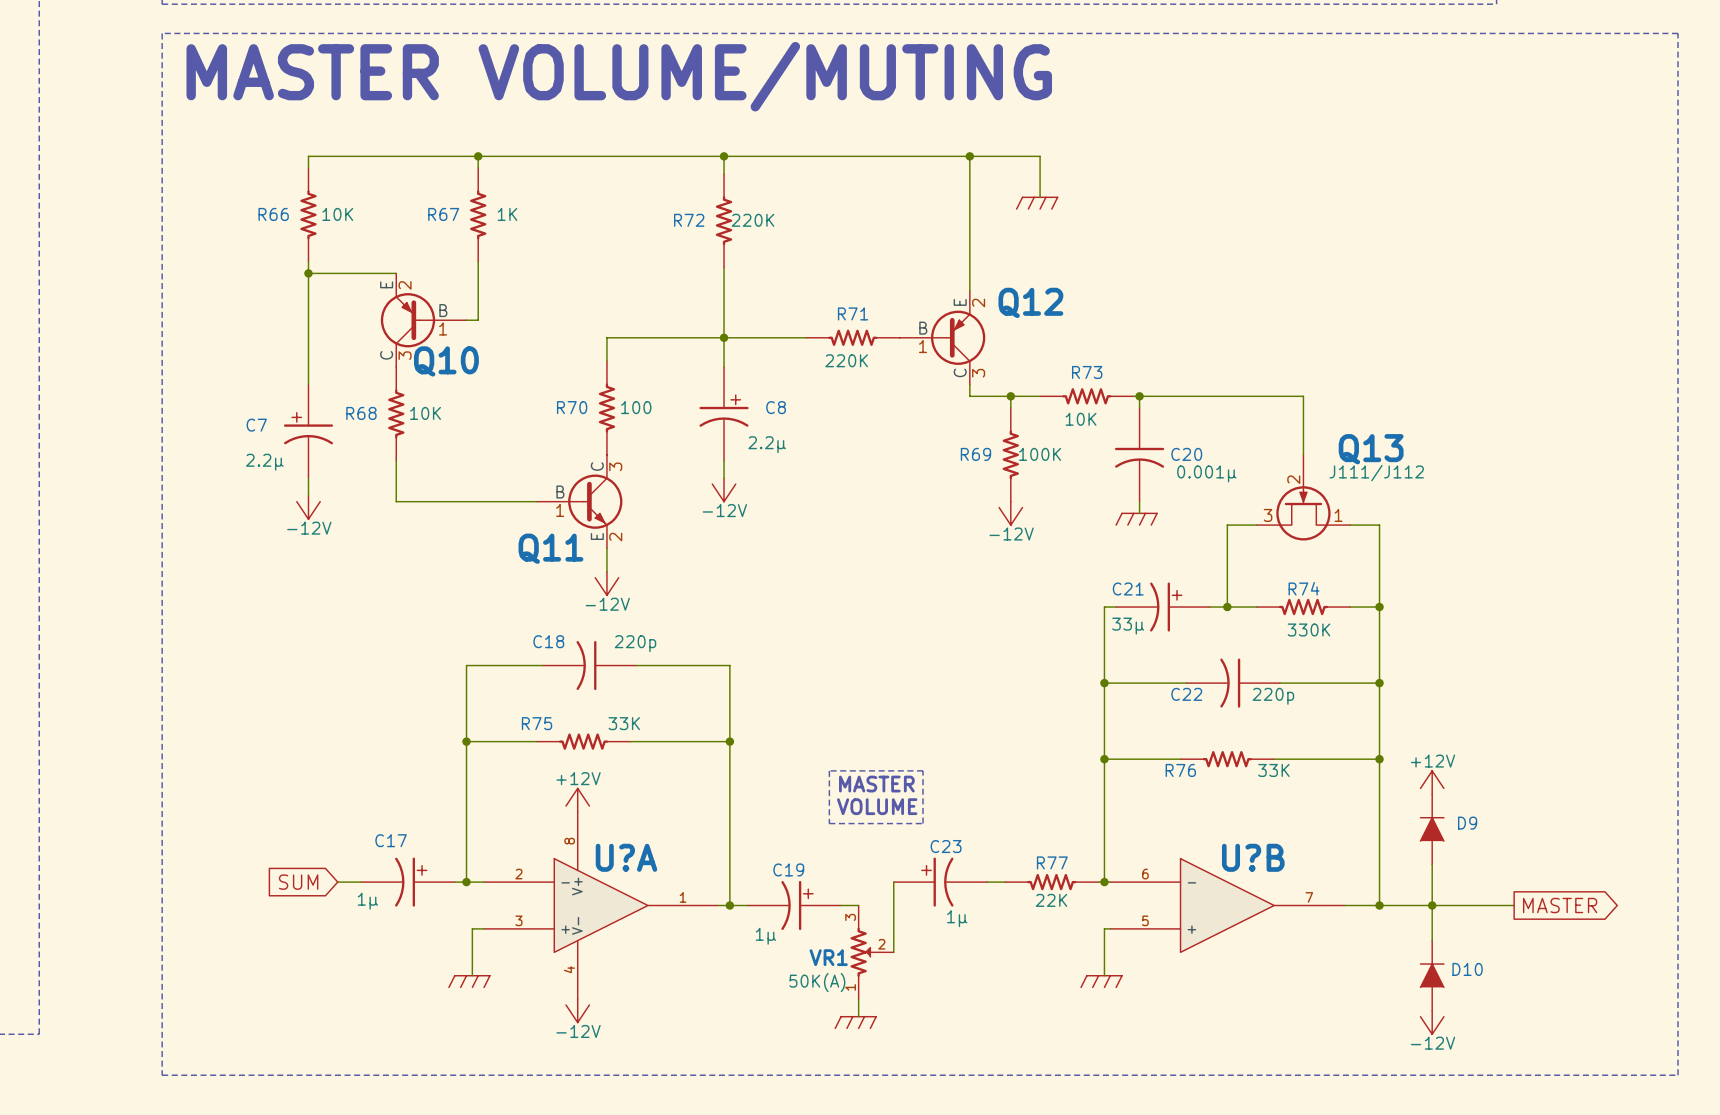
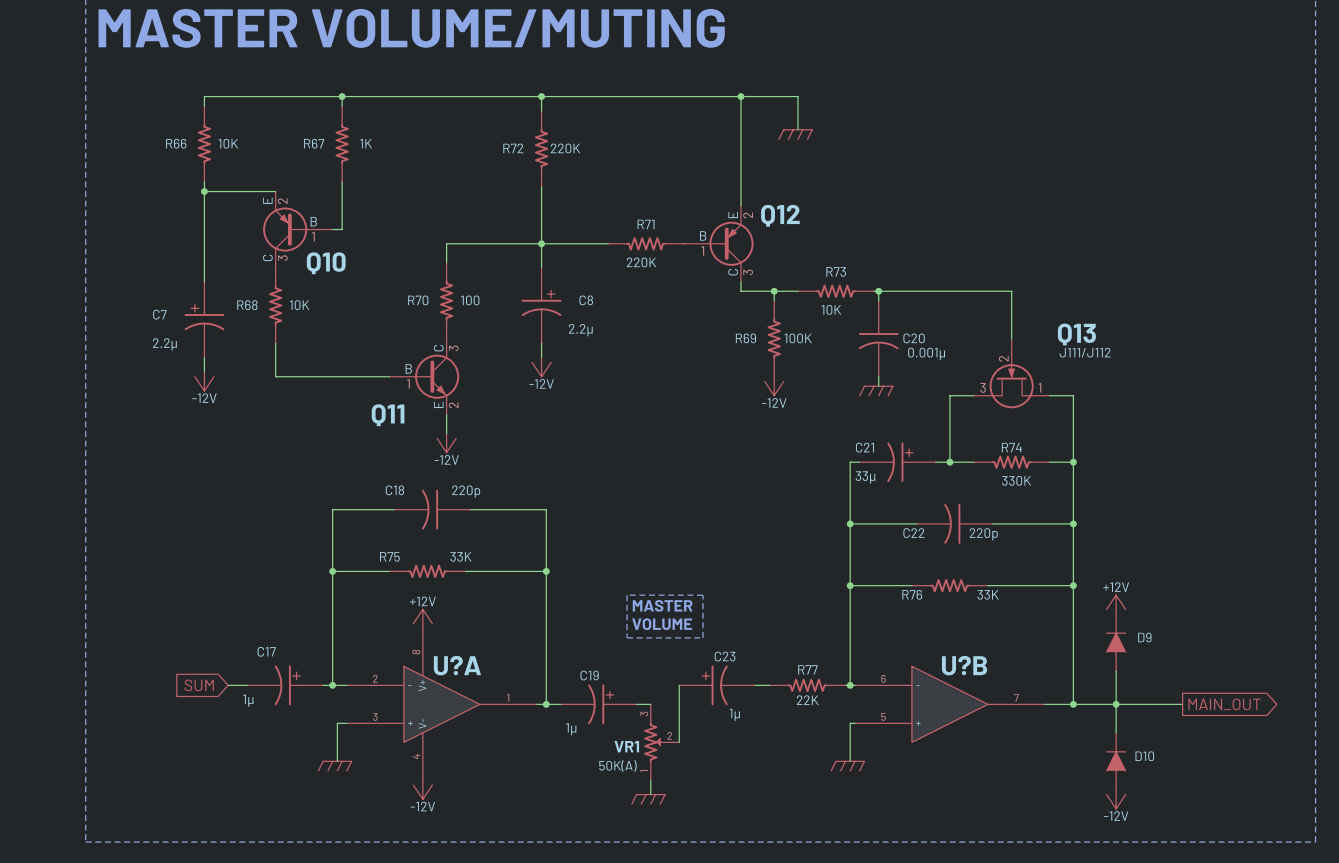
global label: MASTER (1560, 905) -> MAIN_OUT (1224, 704)

